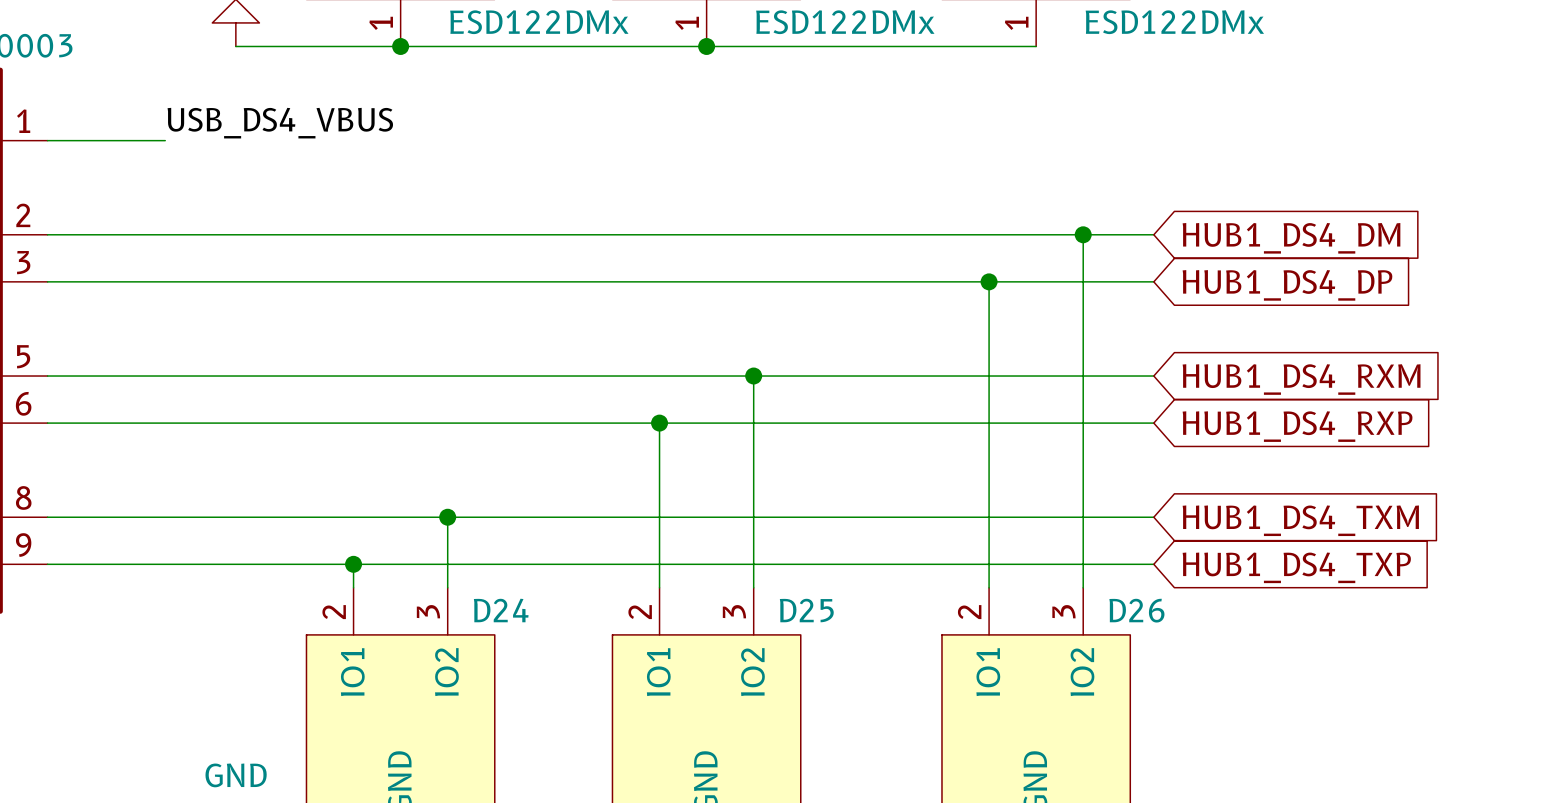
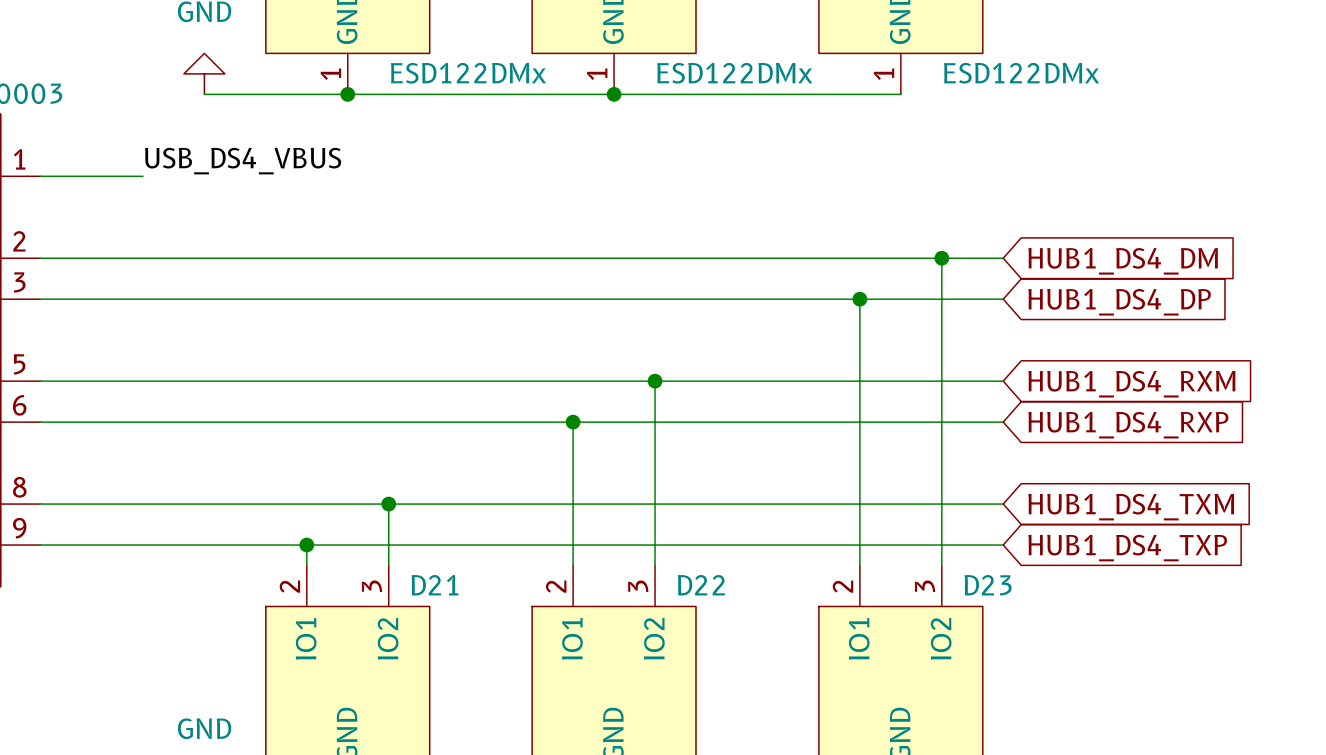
D24 name: D24 (501, 610) -> D21 (434, 585)
D25 name: D25 (806, 610) -> D22 (701, 585)
D26 name: D26 (1136, 610) -> D23 (988, 585)

